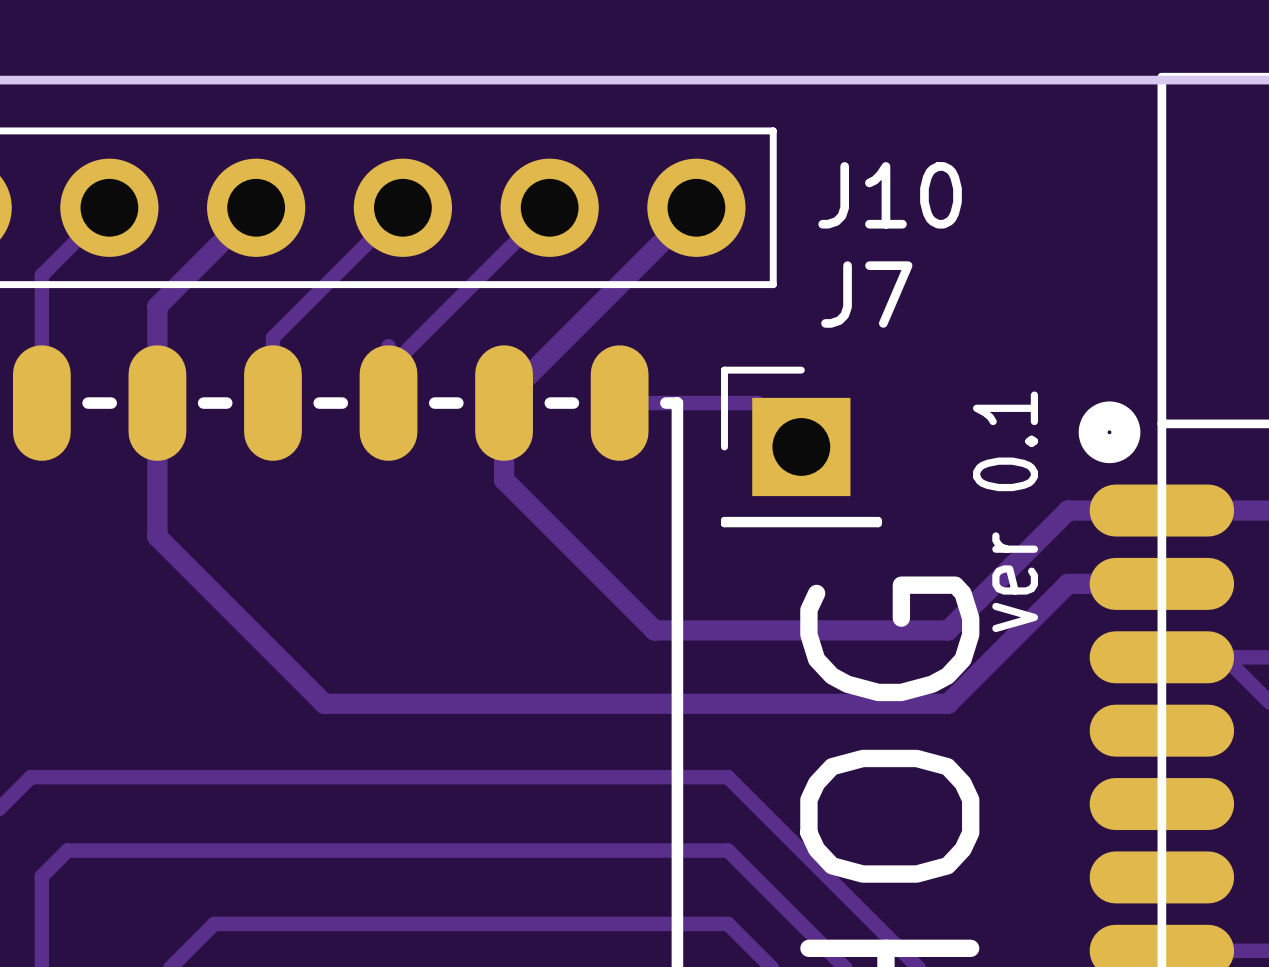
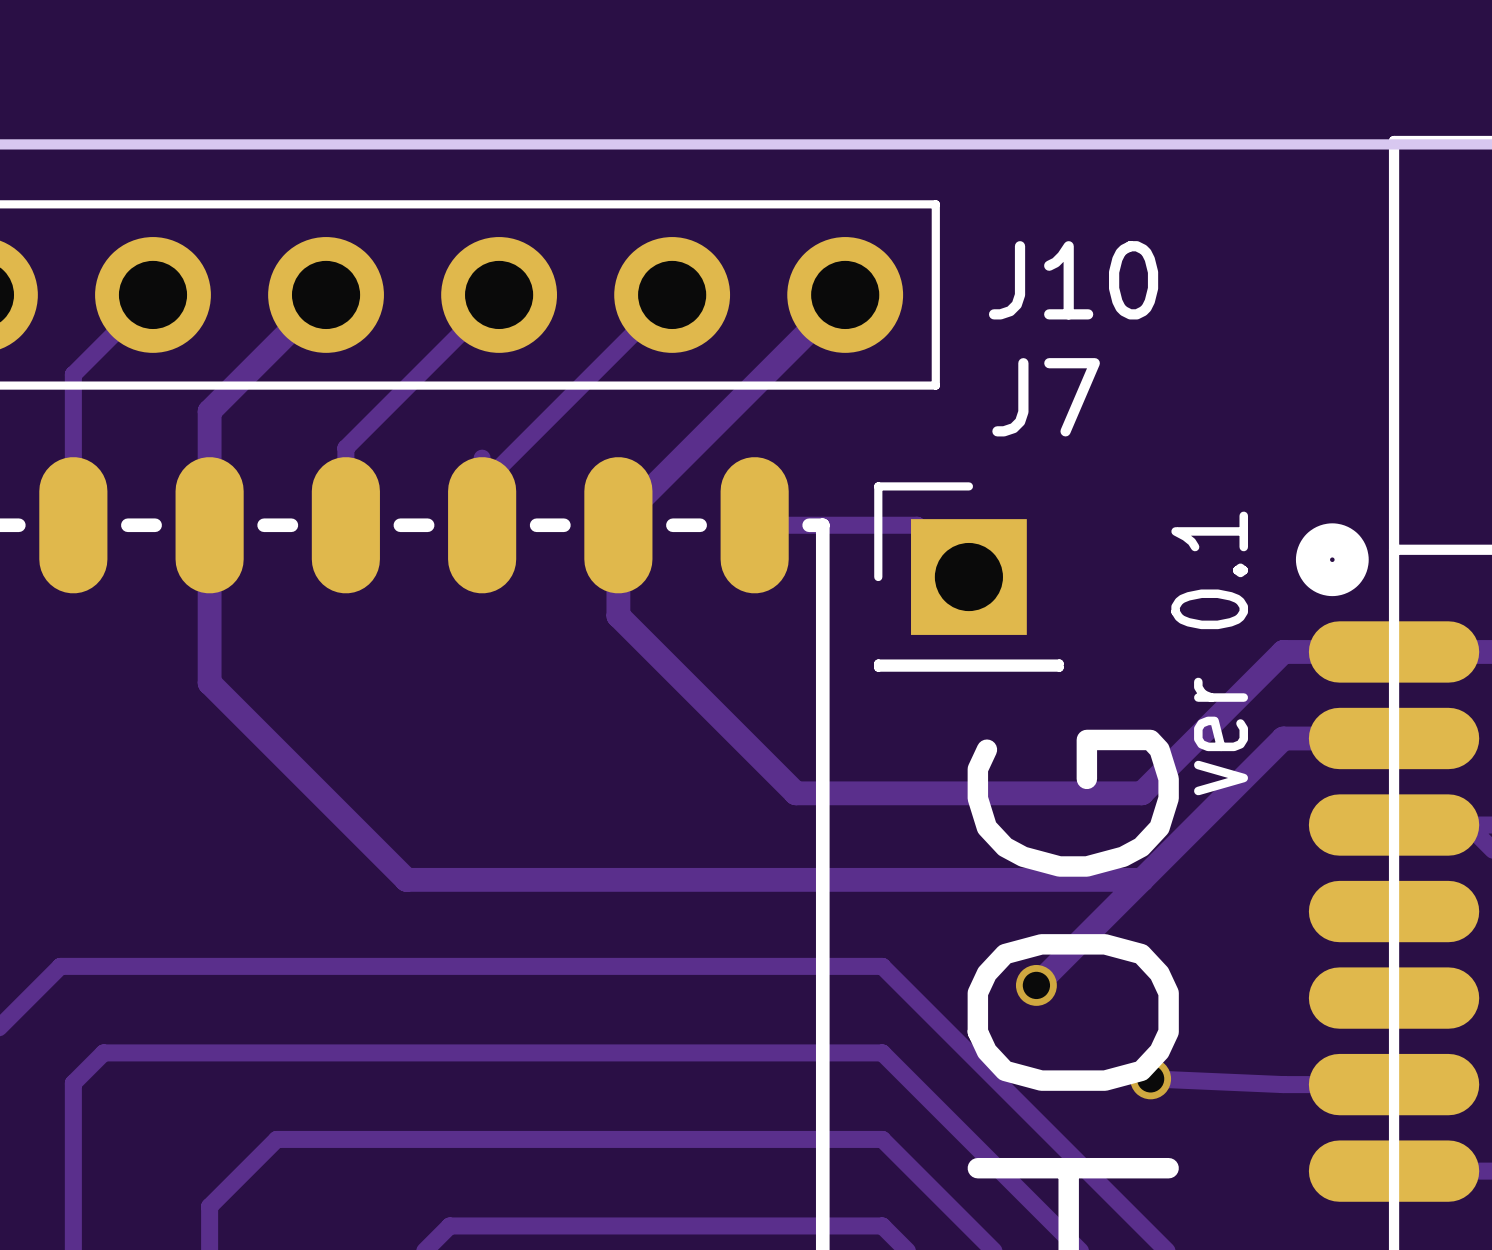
track: none -> (1141, 879) (1036, 985)
via: none -> (1036, 985)
track: none -> (1150, 1078) (1283, 1084) (1394, 1084)
via: none -> (1150, 1078)

